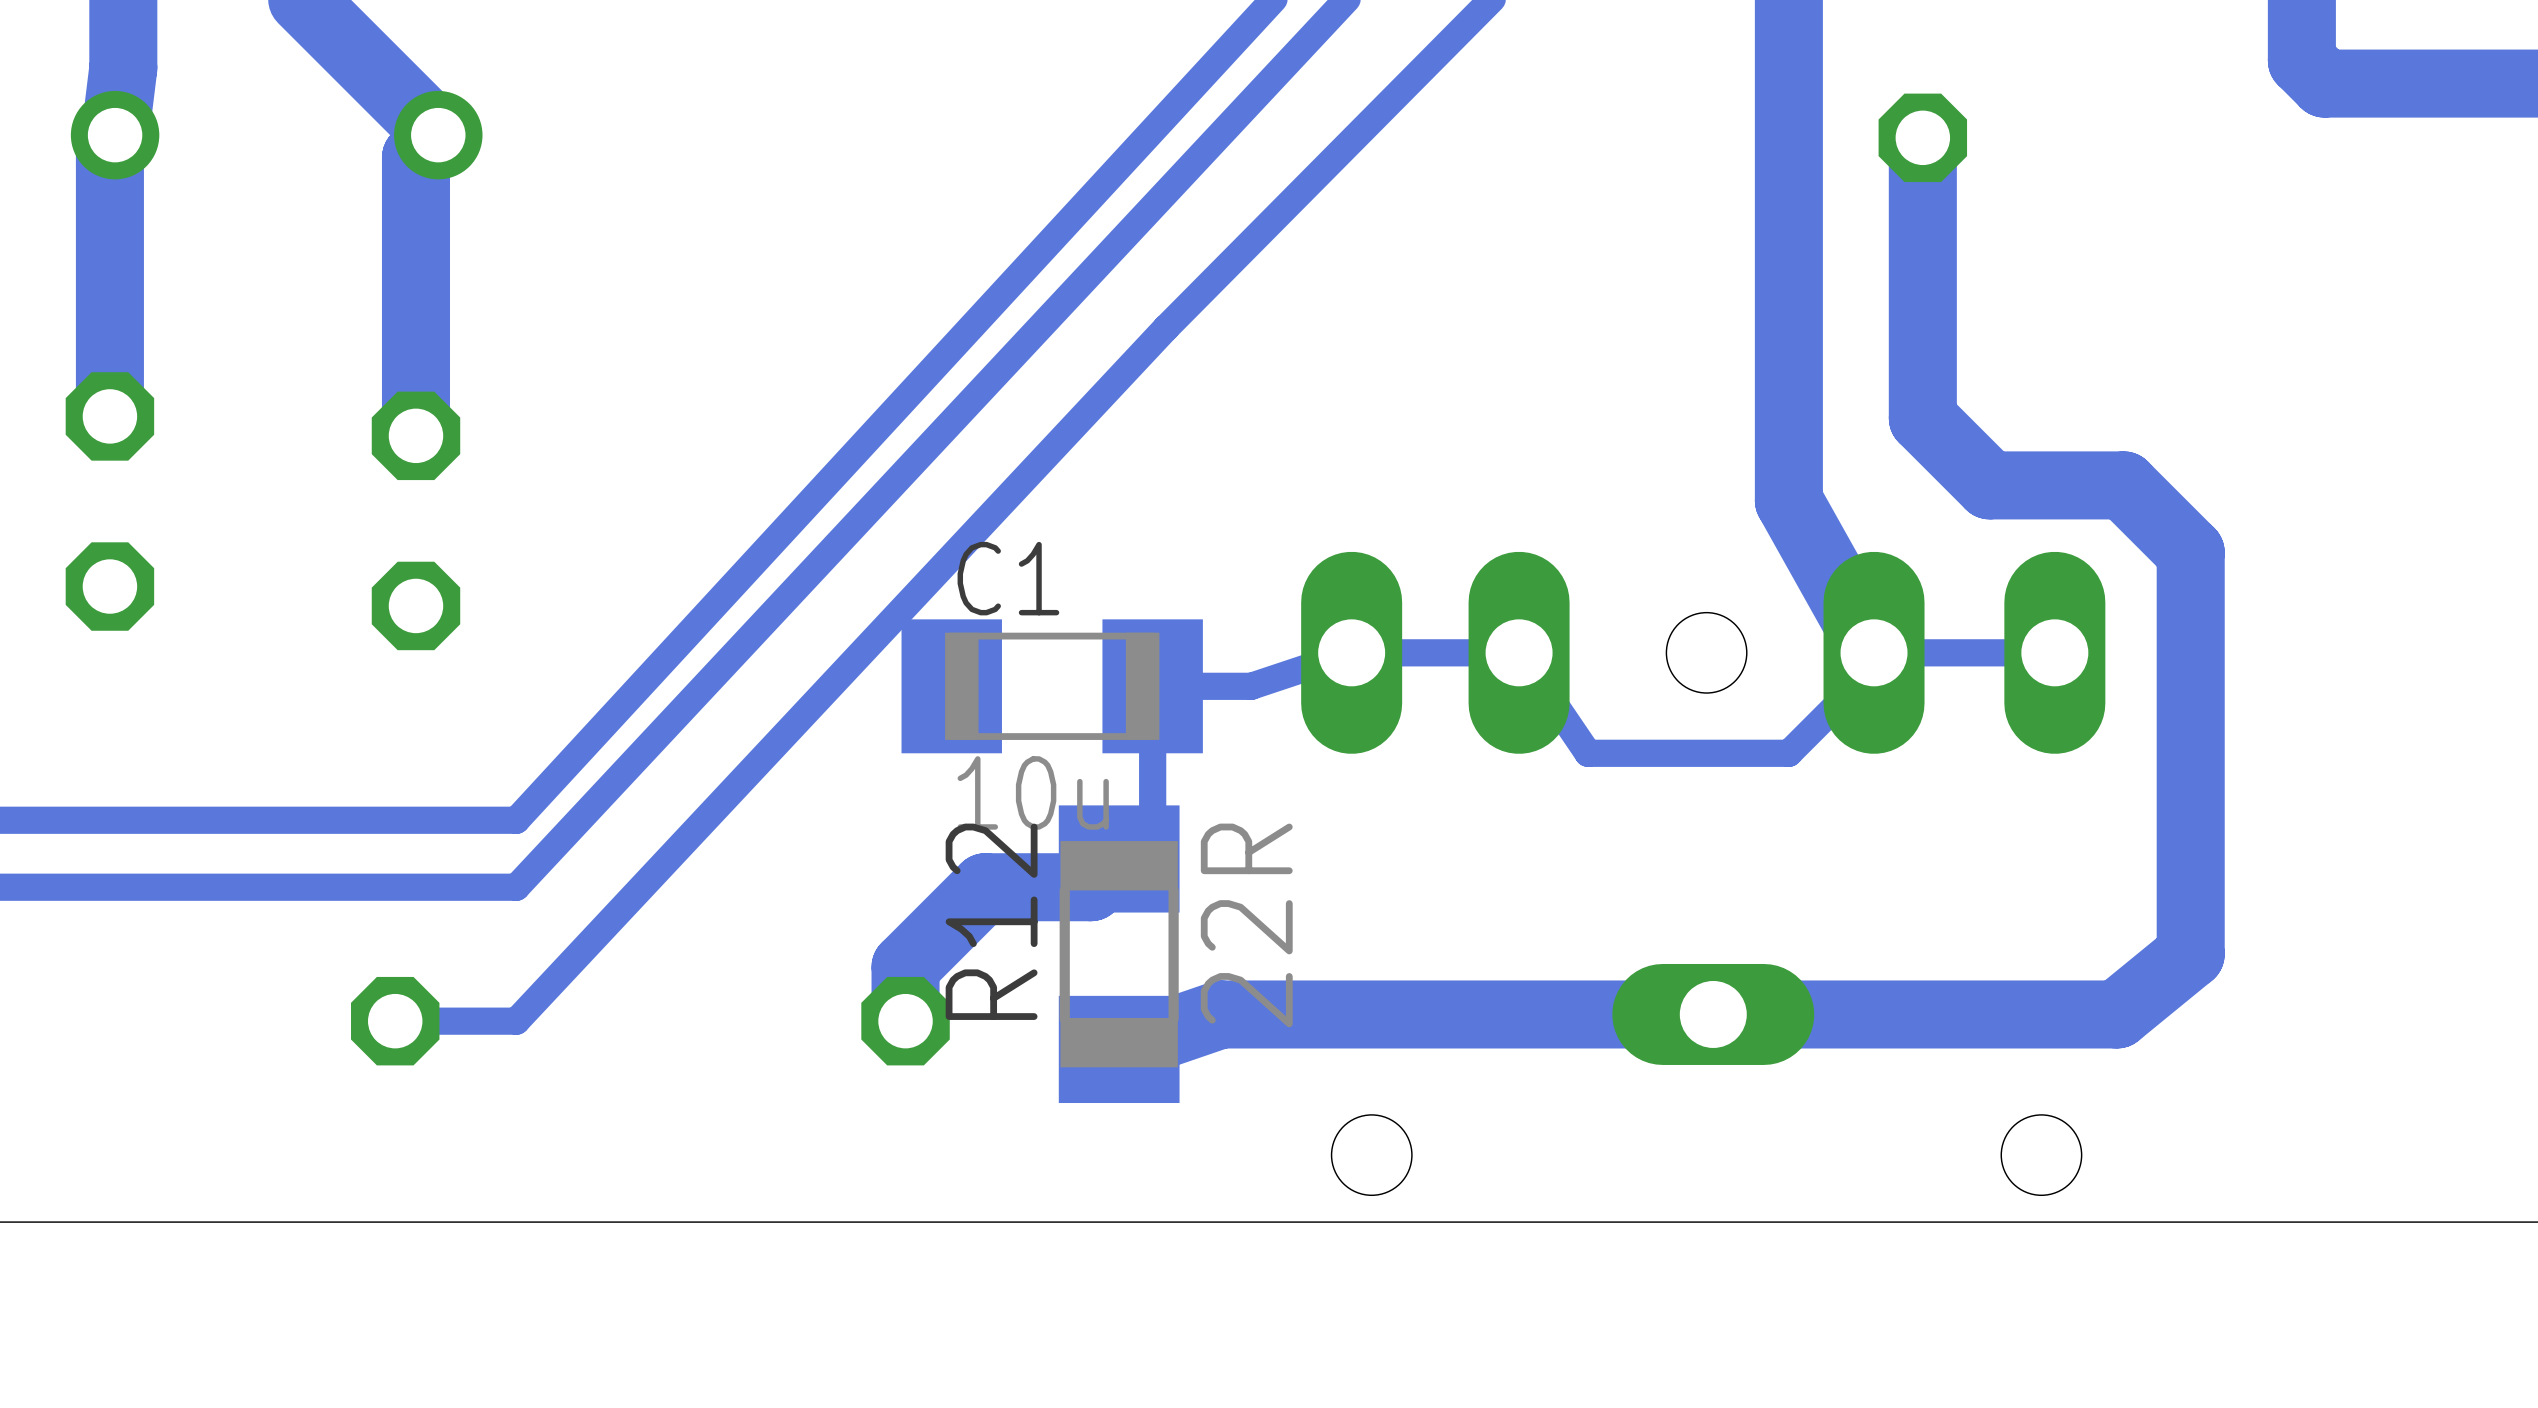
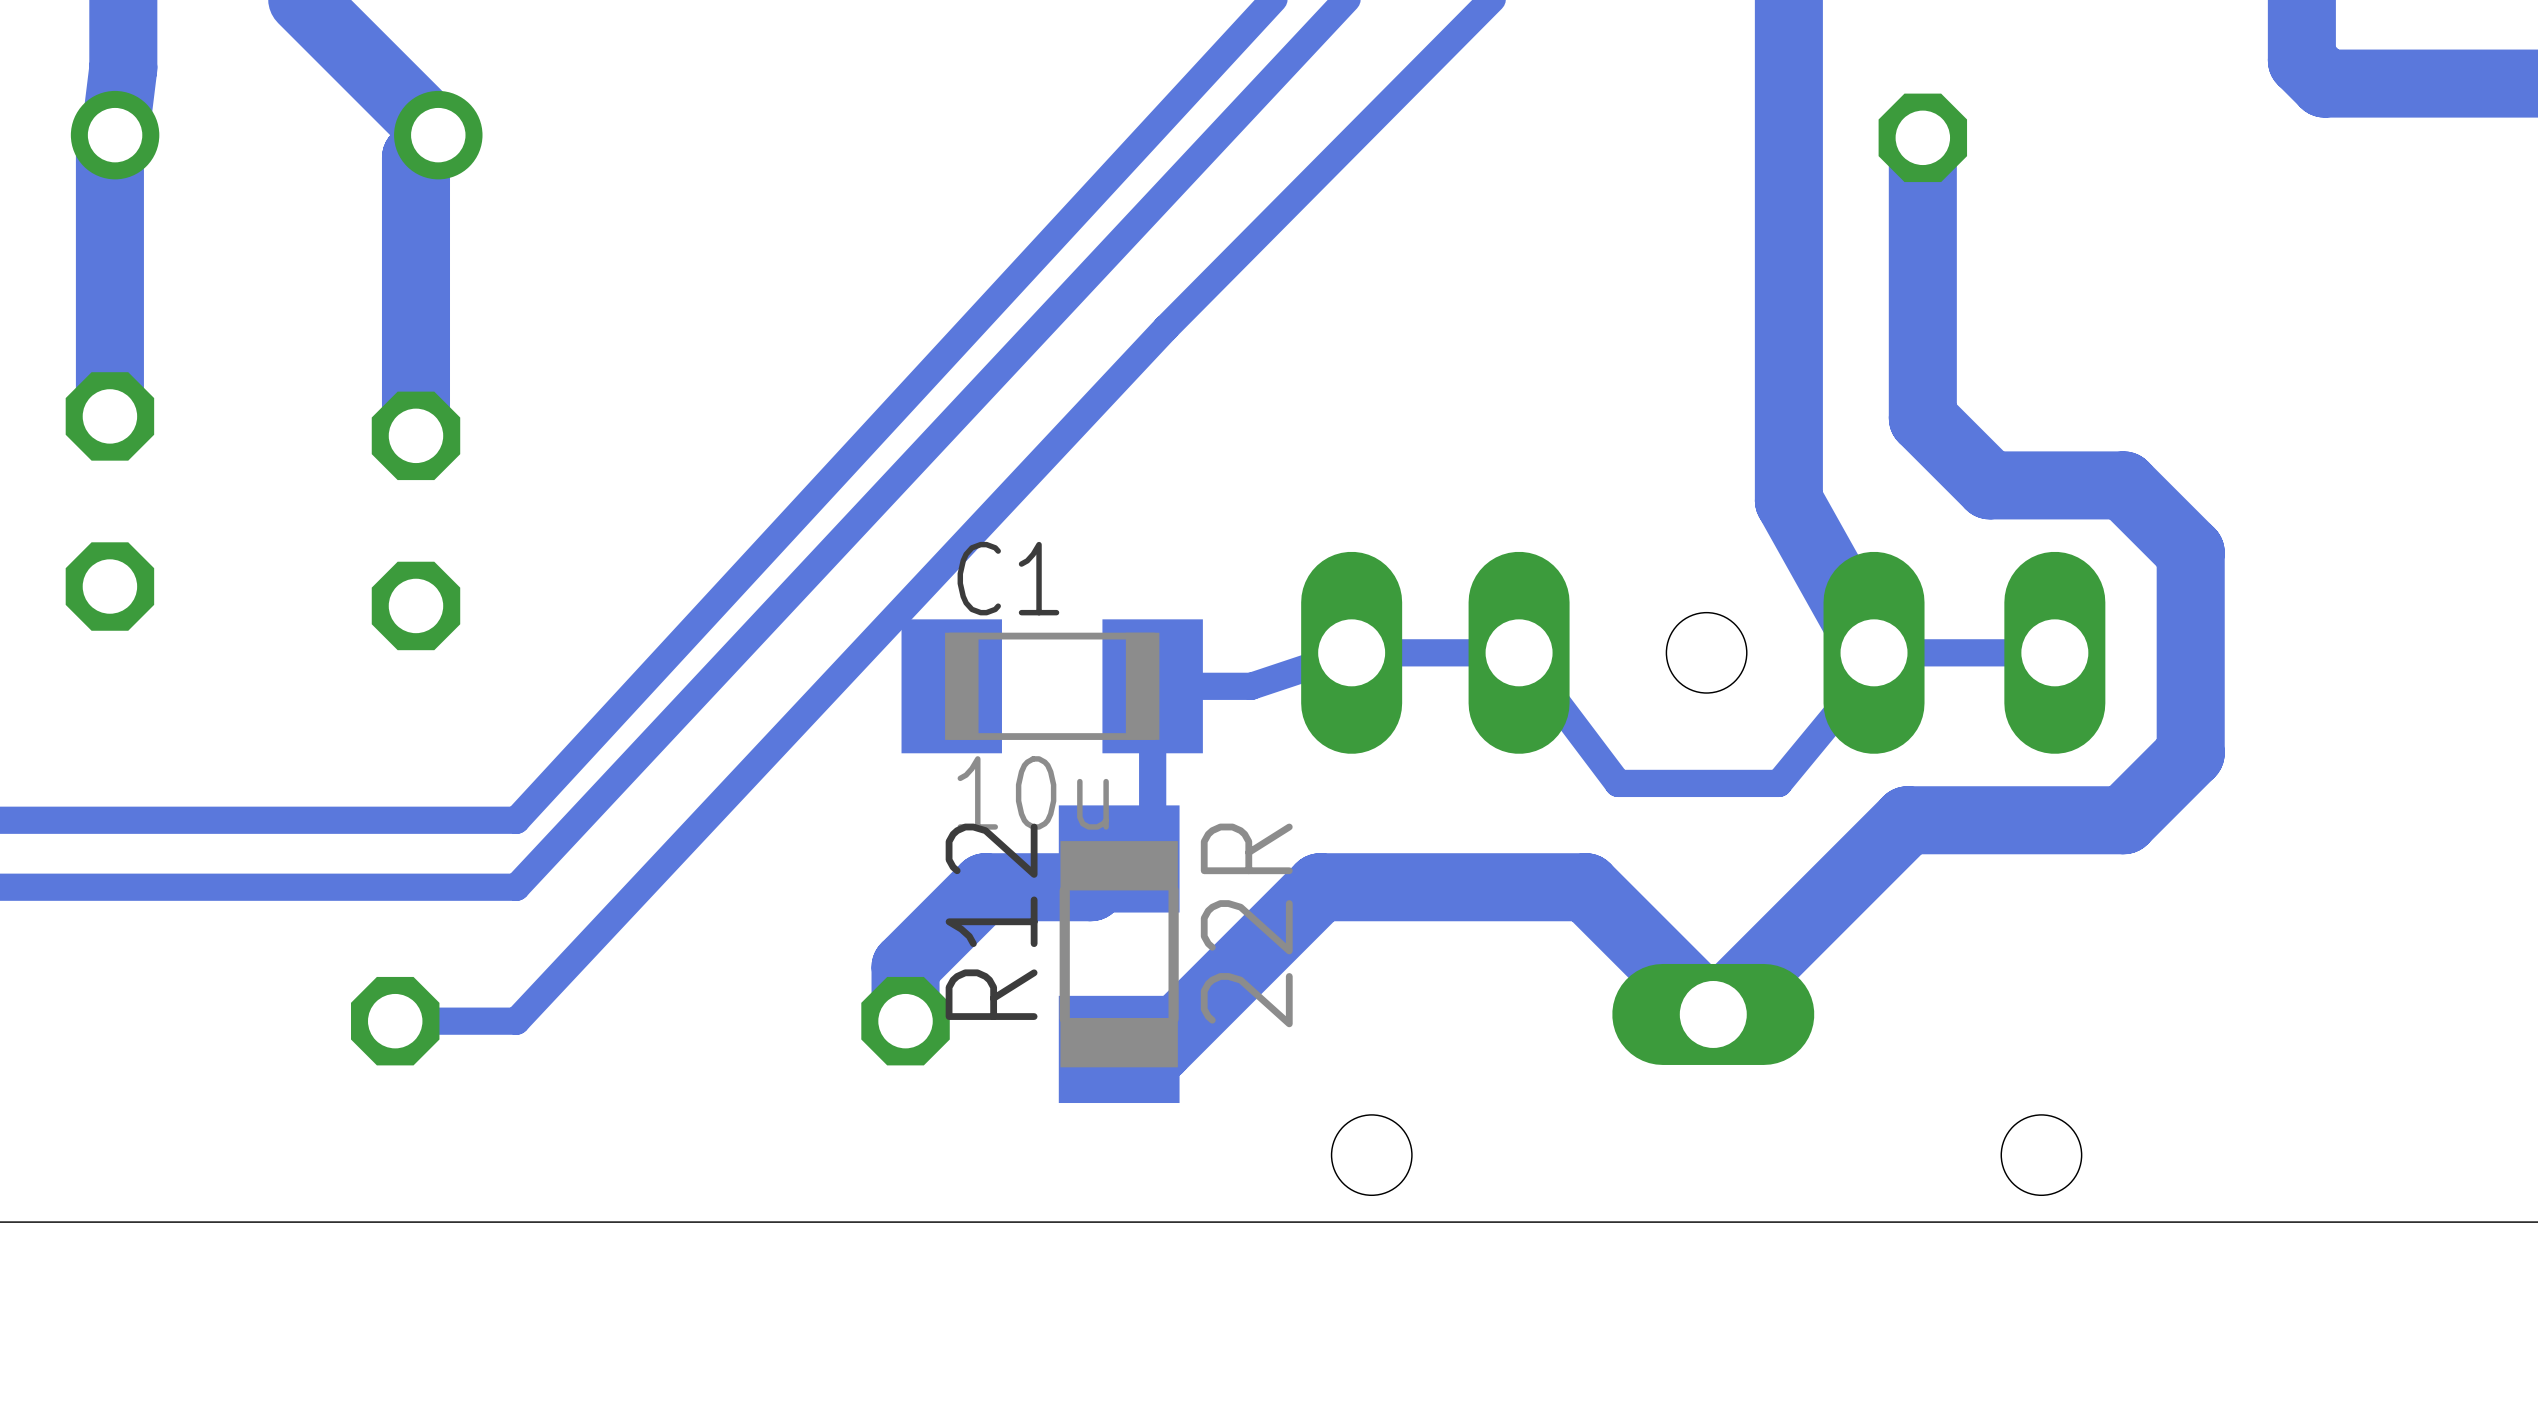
bottom track: (1521, 654) (1587, 753) (1788, 753) (1874, 668) -> (1521, 654) (1618, 783) (1778, 783) (1874, 668)
bottom track: (2190, 753) (2190, 954) (2117, 1014) (1221, 1014) (1119, 1049) -> (2190, 753) (2123, 820) (1907, 820) (1713, 1014) (1586, 887) (1320, 887) (1157, 1049) (1119, 1049)

